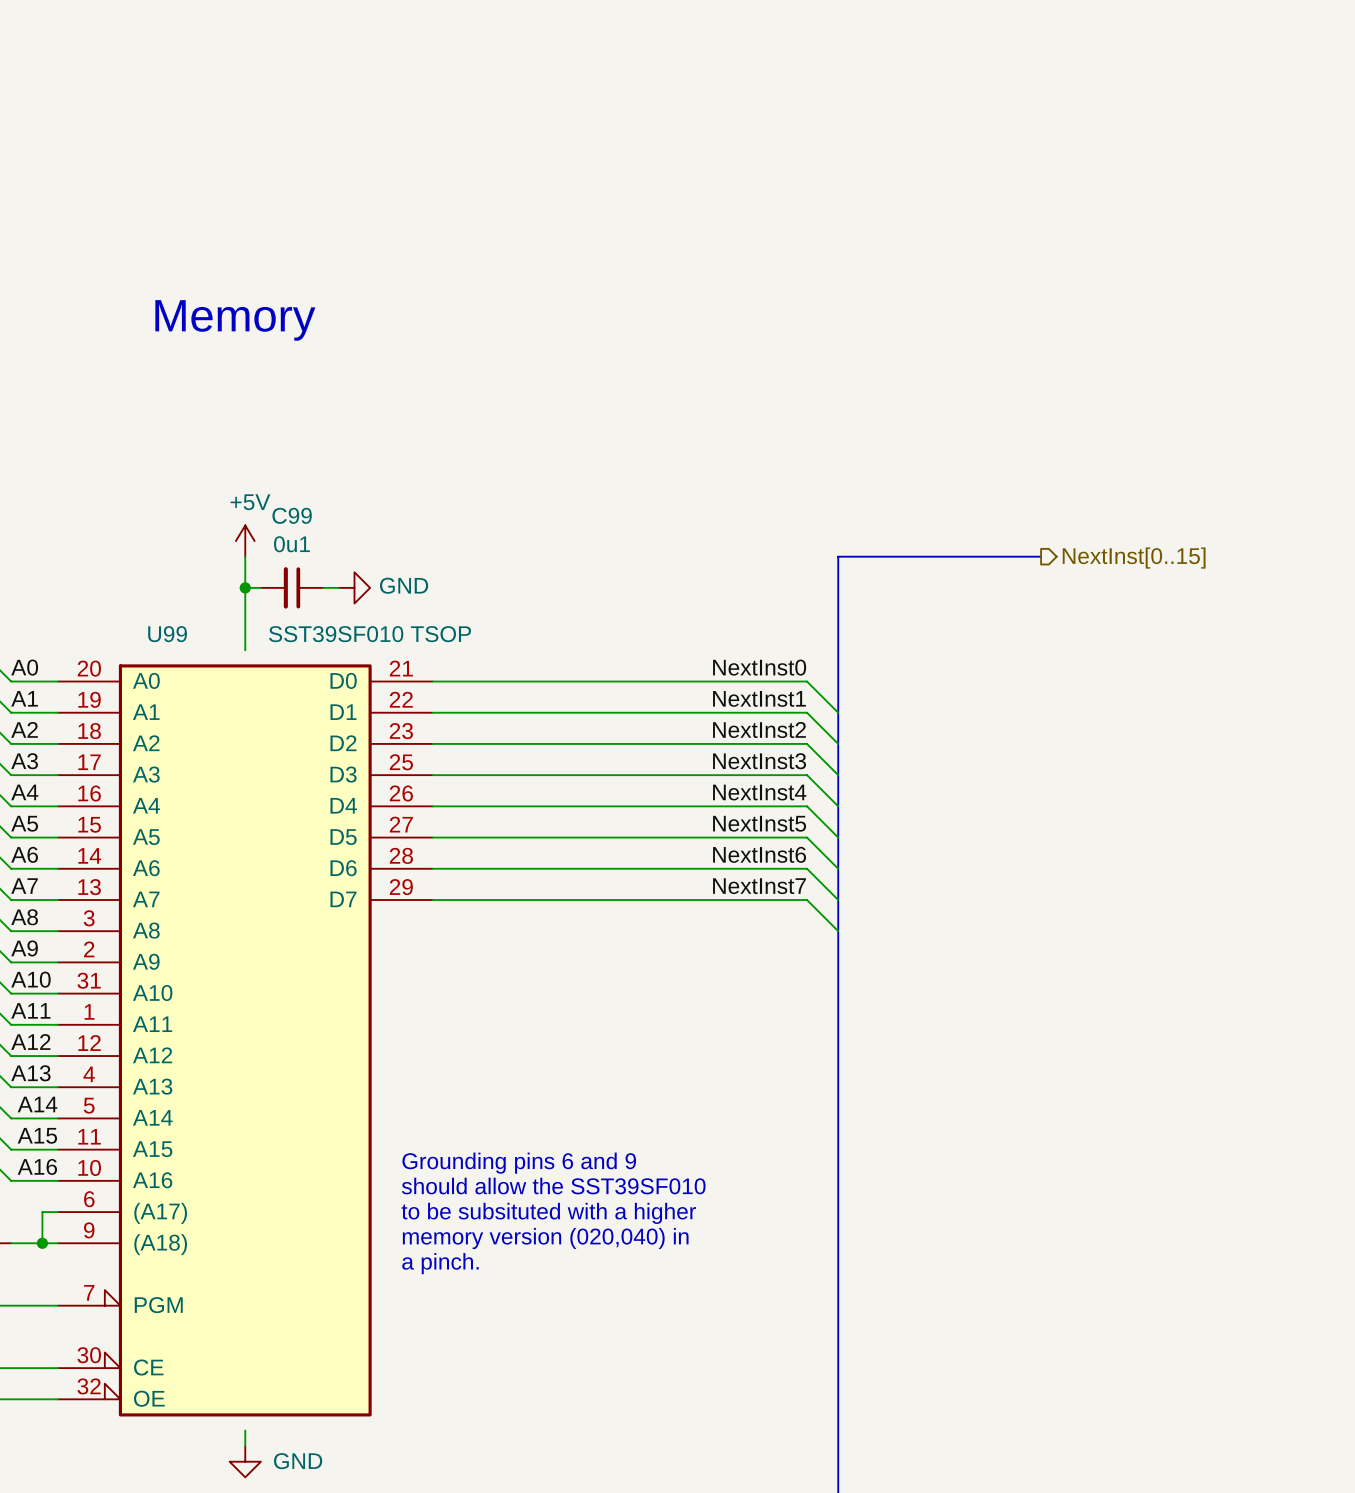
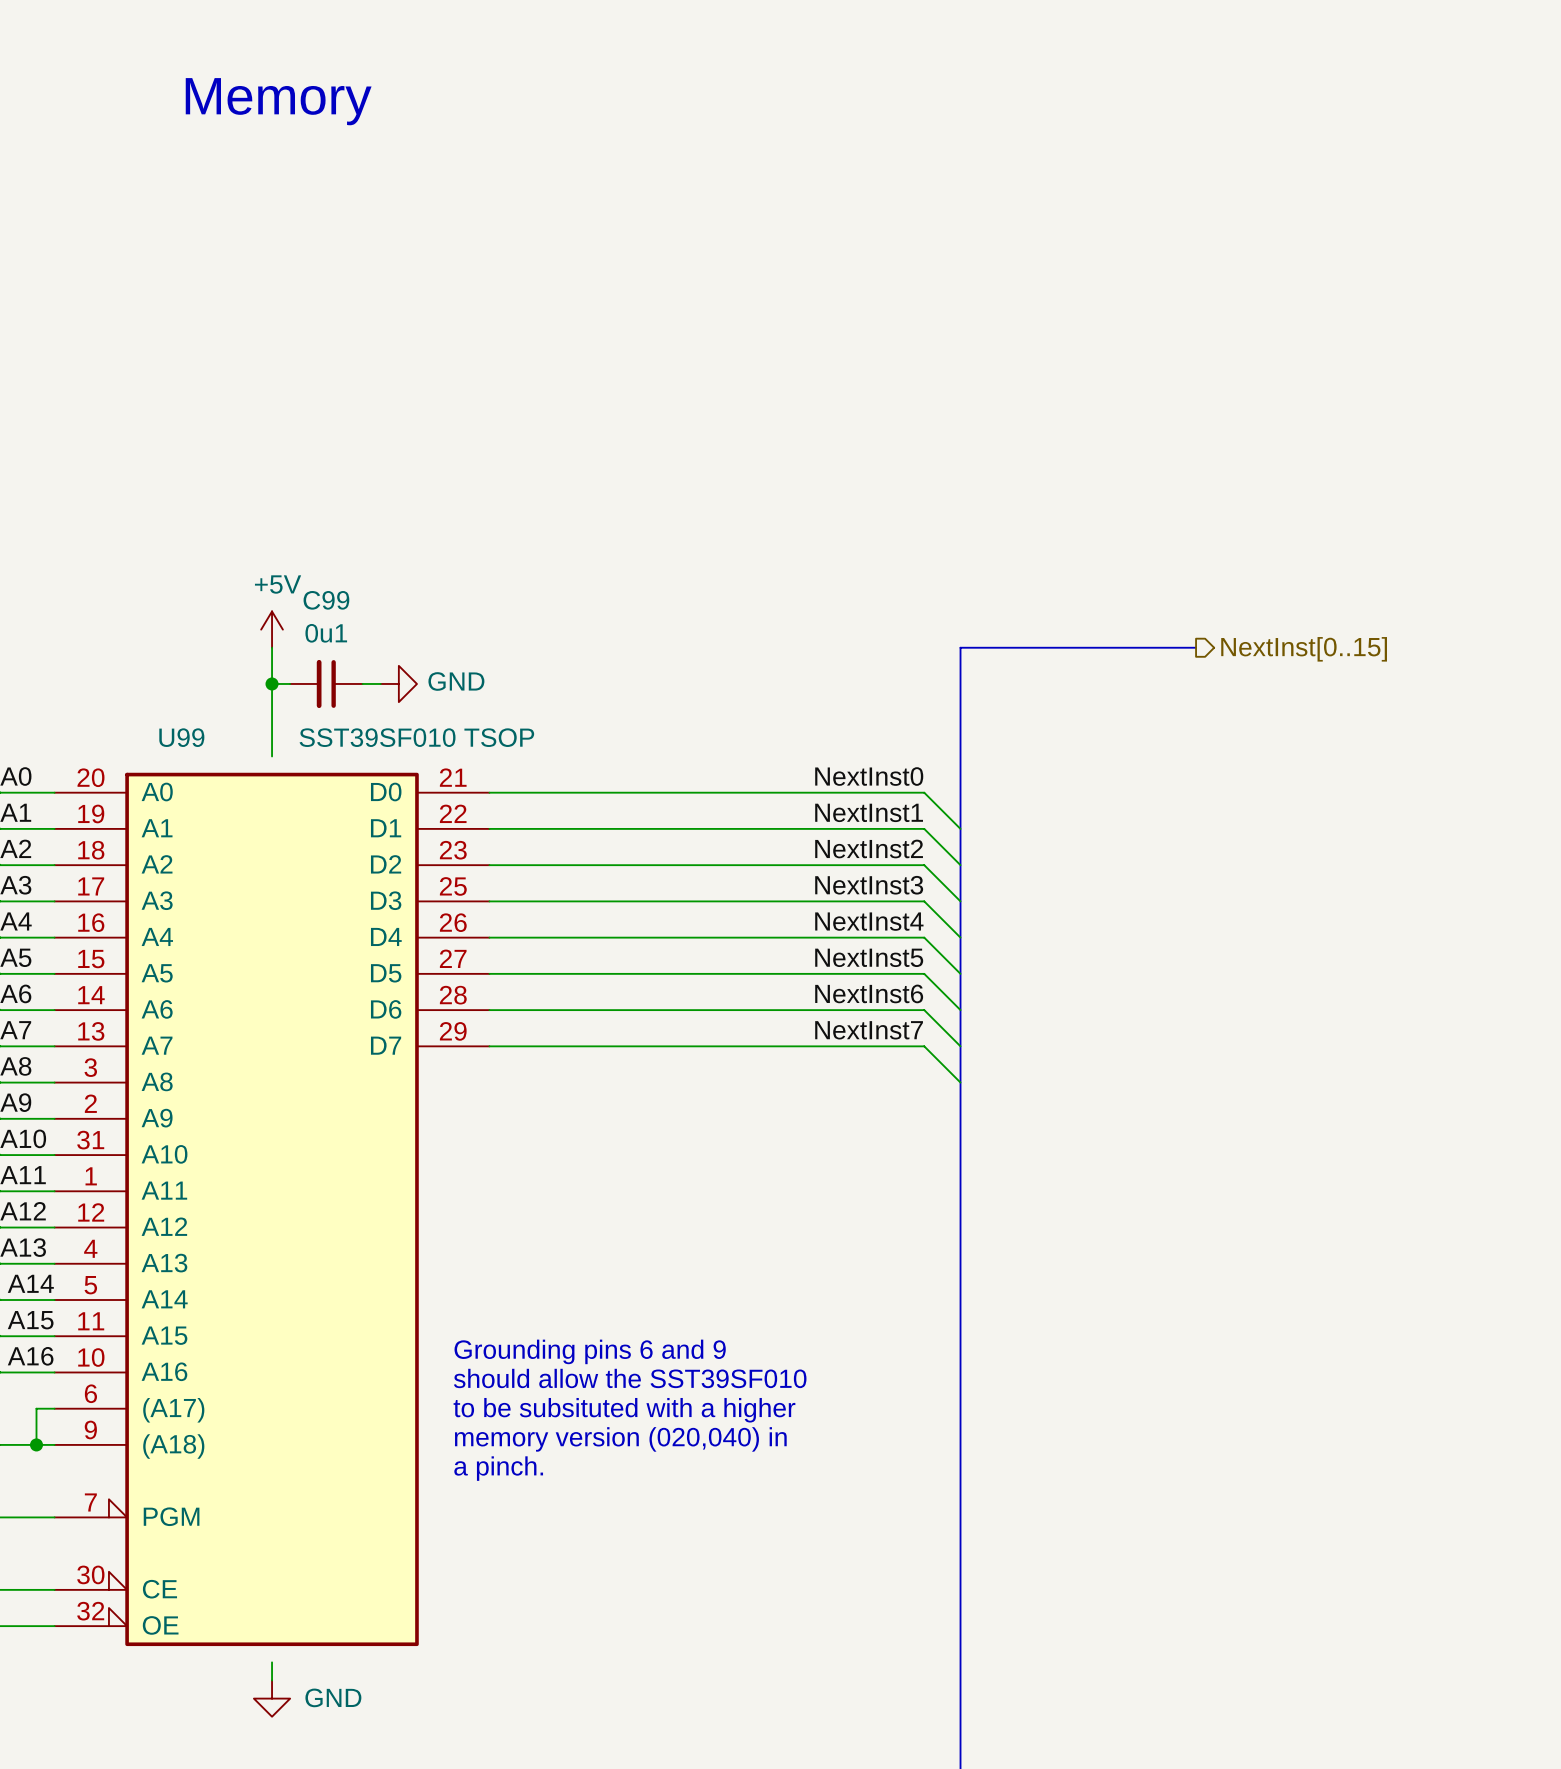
text position: Memory (235, 320) -> Memory (278, 101)

